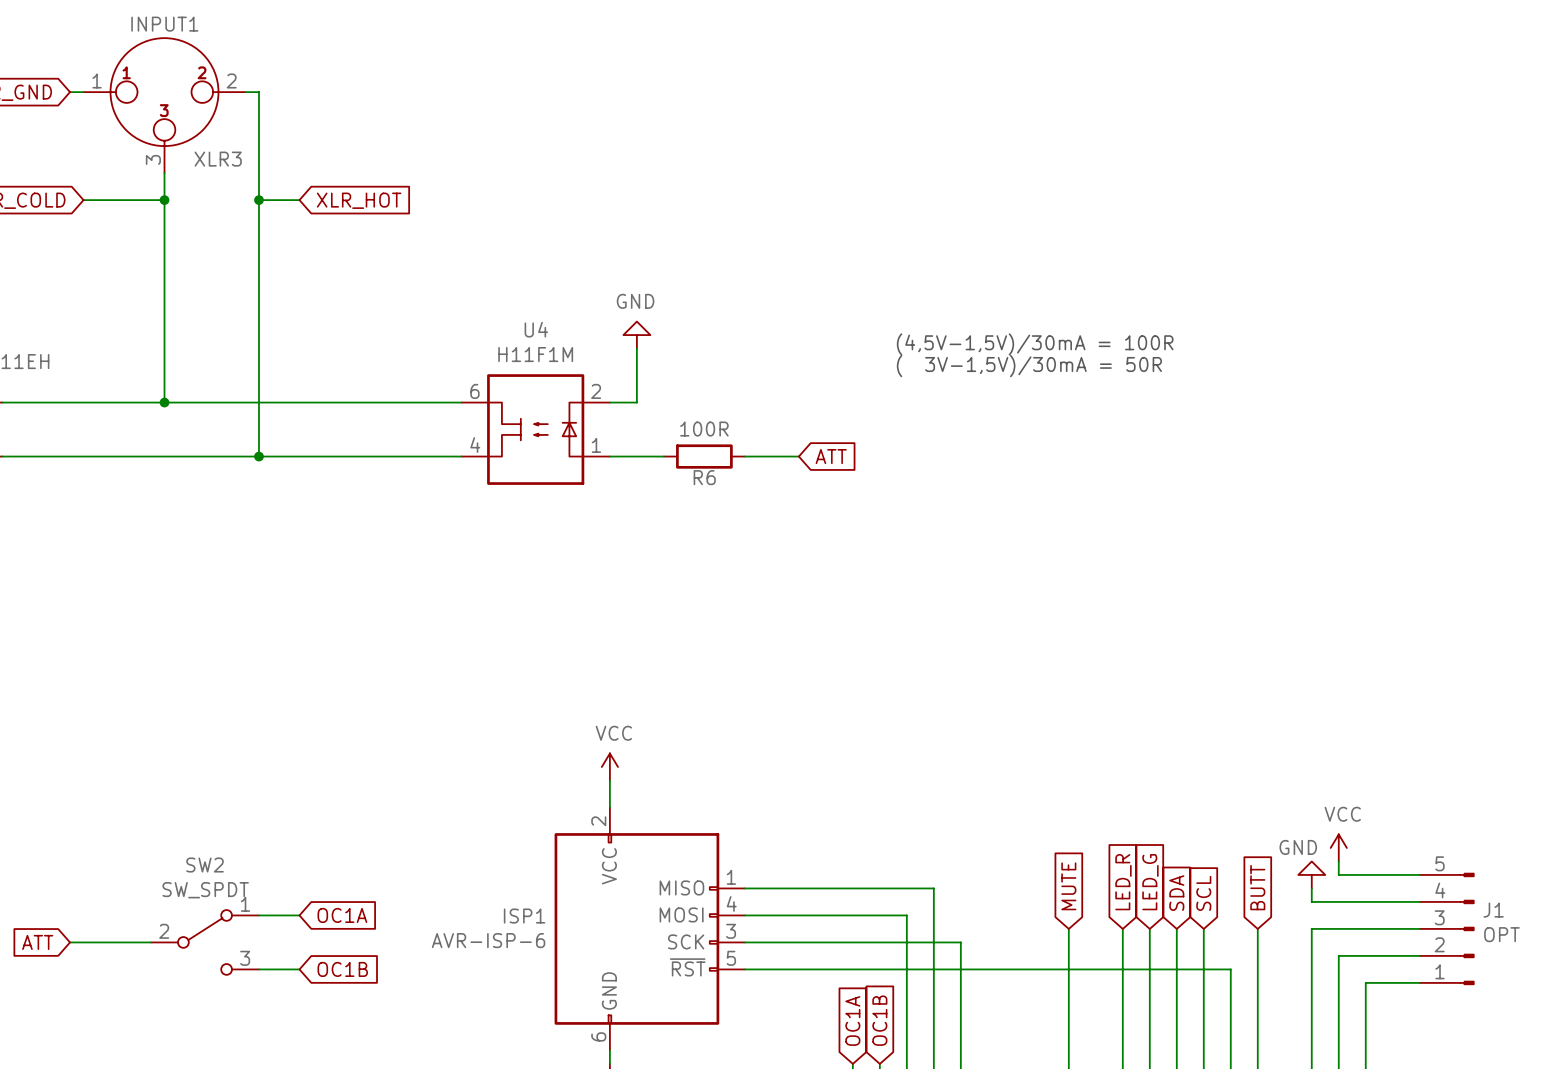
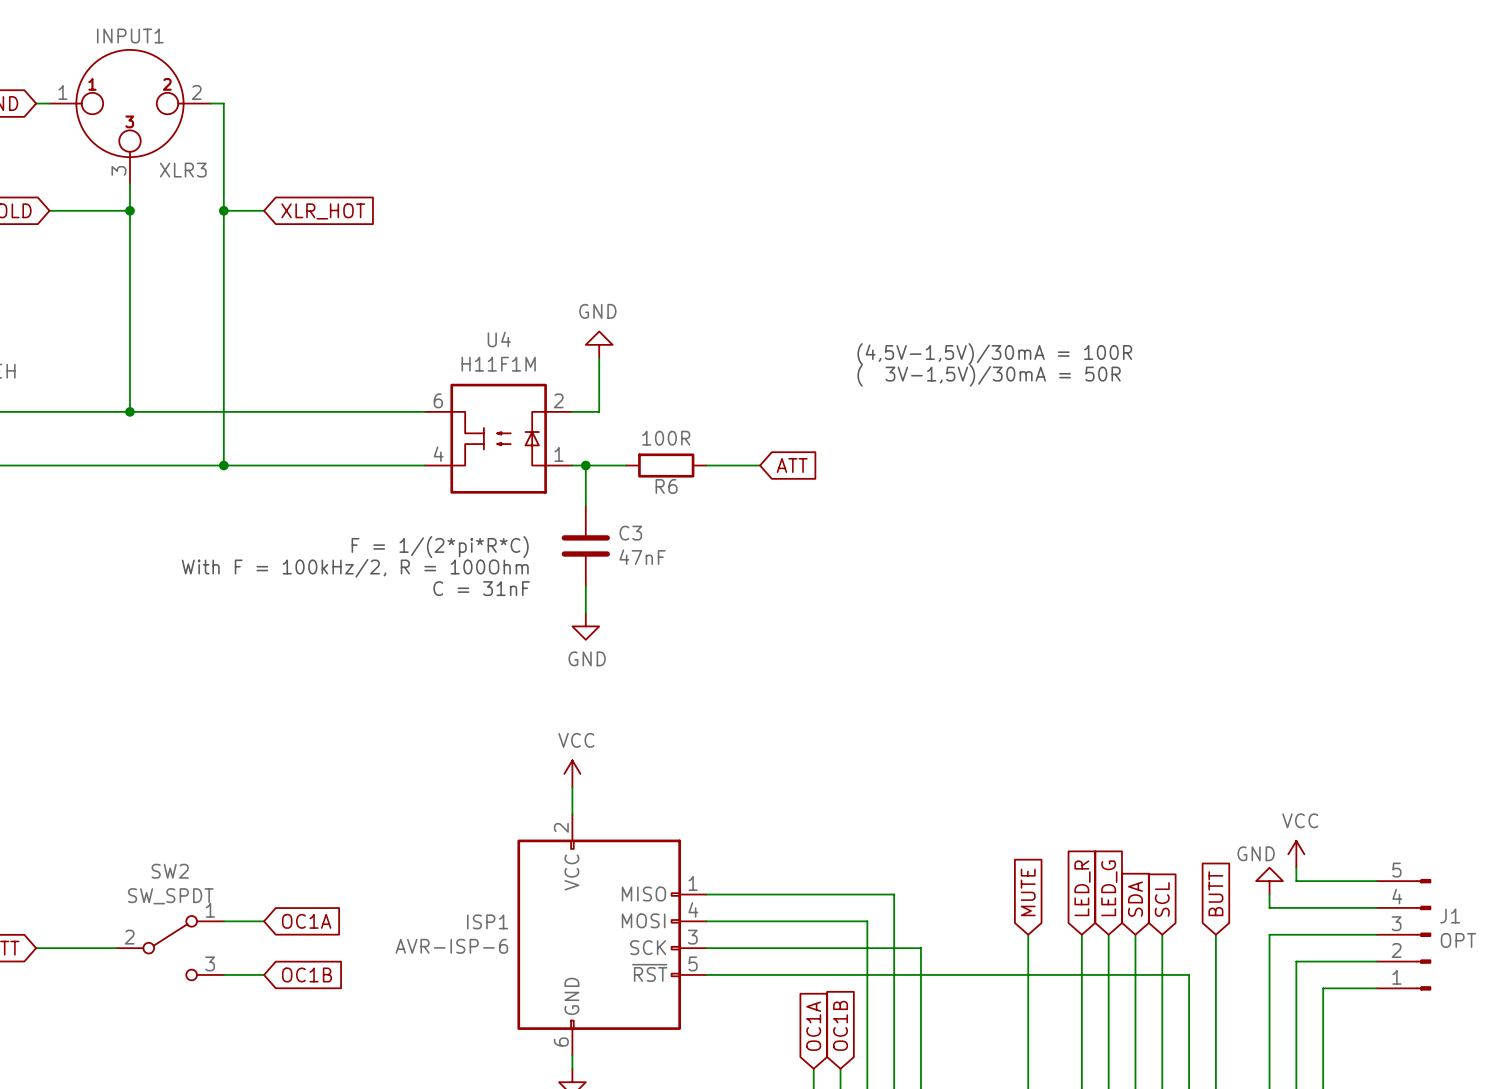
wire: none -> (585, 465) (585, 505)
junction: none -> (585, 465)
C3: none -> 47nF (585, 545)
text: none -> F = 1/(2*pi*R*C) (440, 547)
text: none -> With F = 100kHz/2, R = 100Ohm (355, 568)
wire: none -> (585, 586) (585, 612)
text: none -> C = 31nF (481, 588)
power symbol: none -> GND (585, 626)

